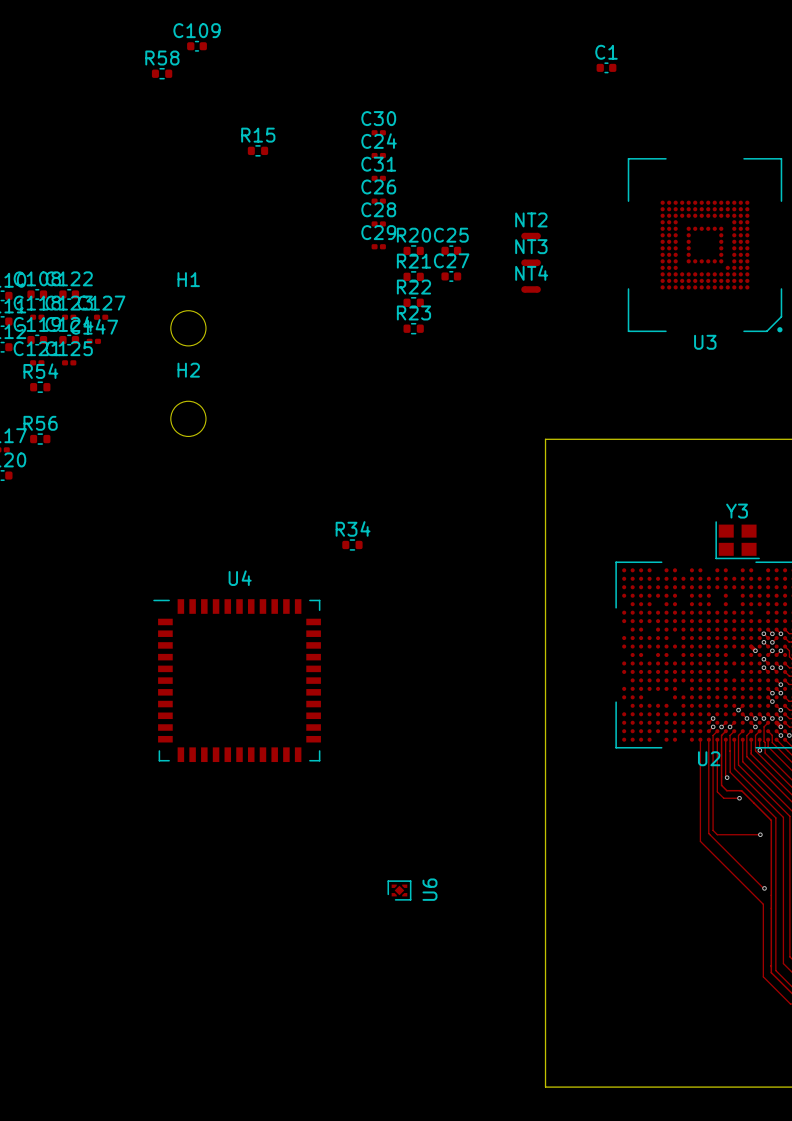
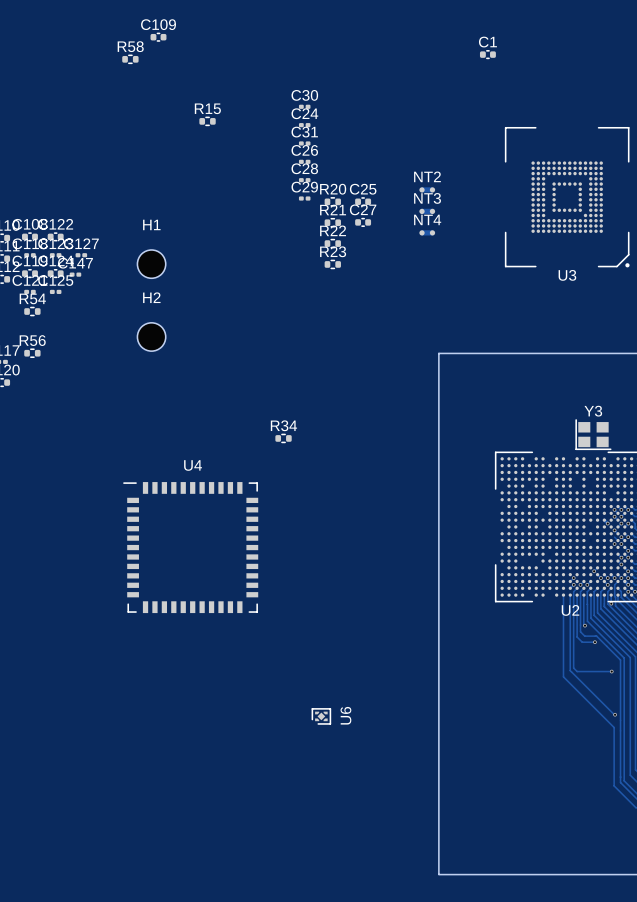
via: (763, 667) -> none
via: none -> (614, 543)
via: none -> (621, 543)

